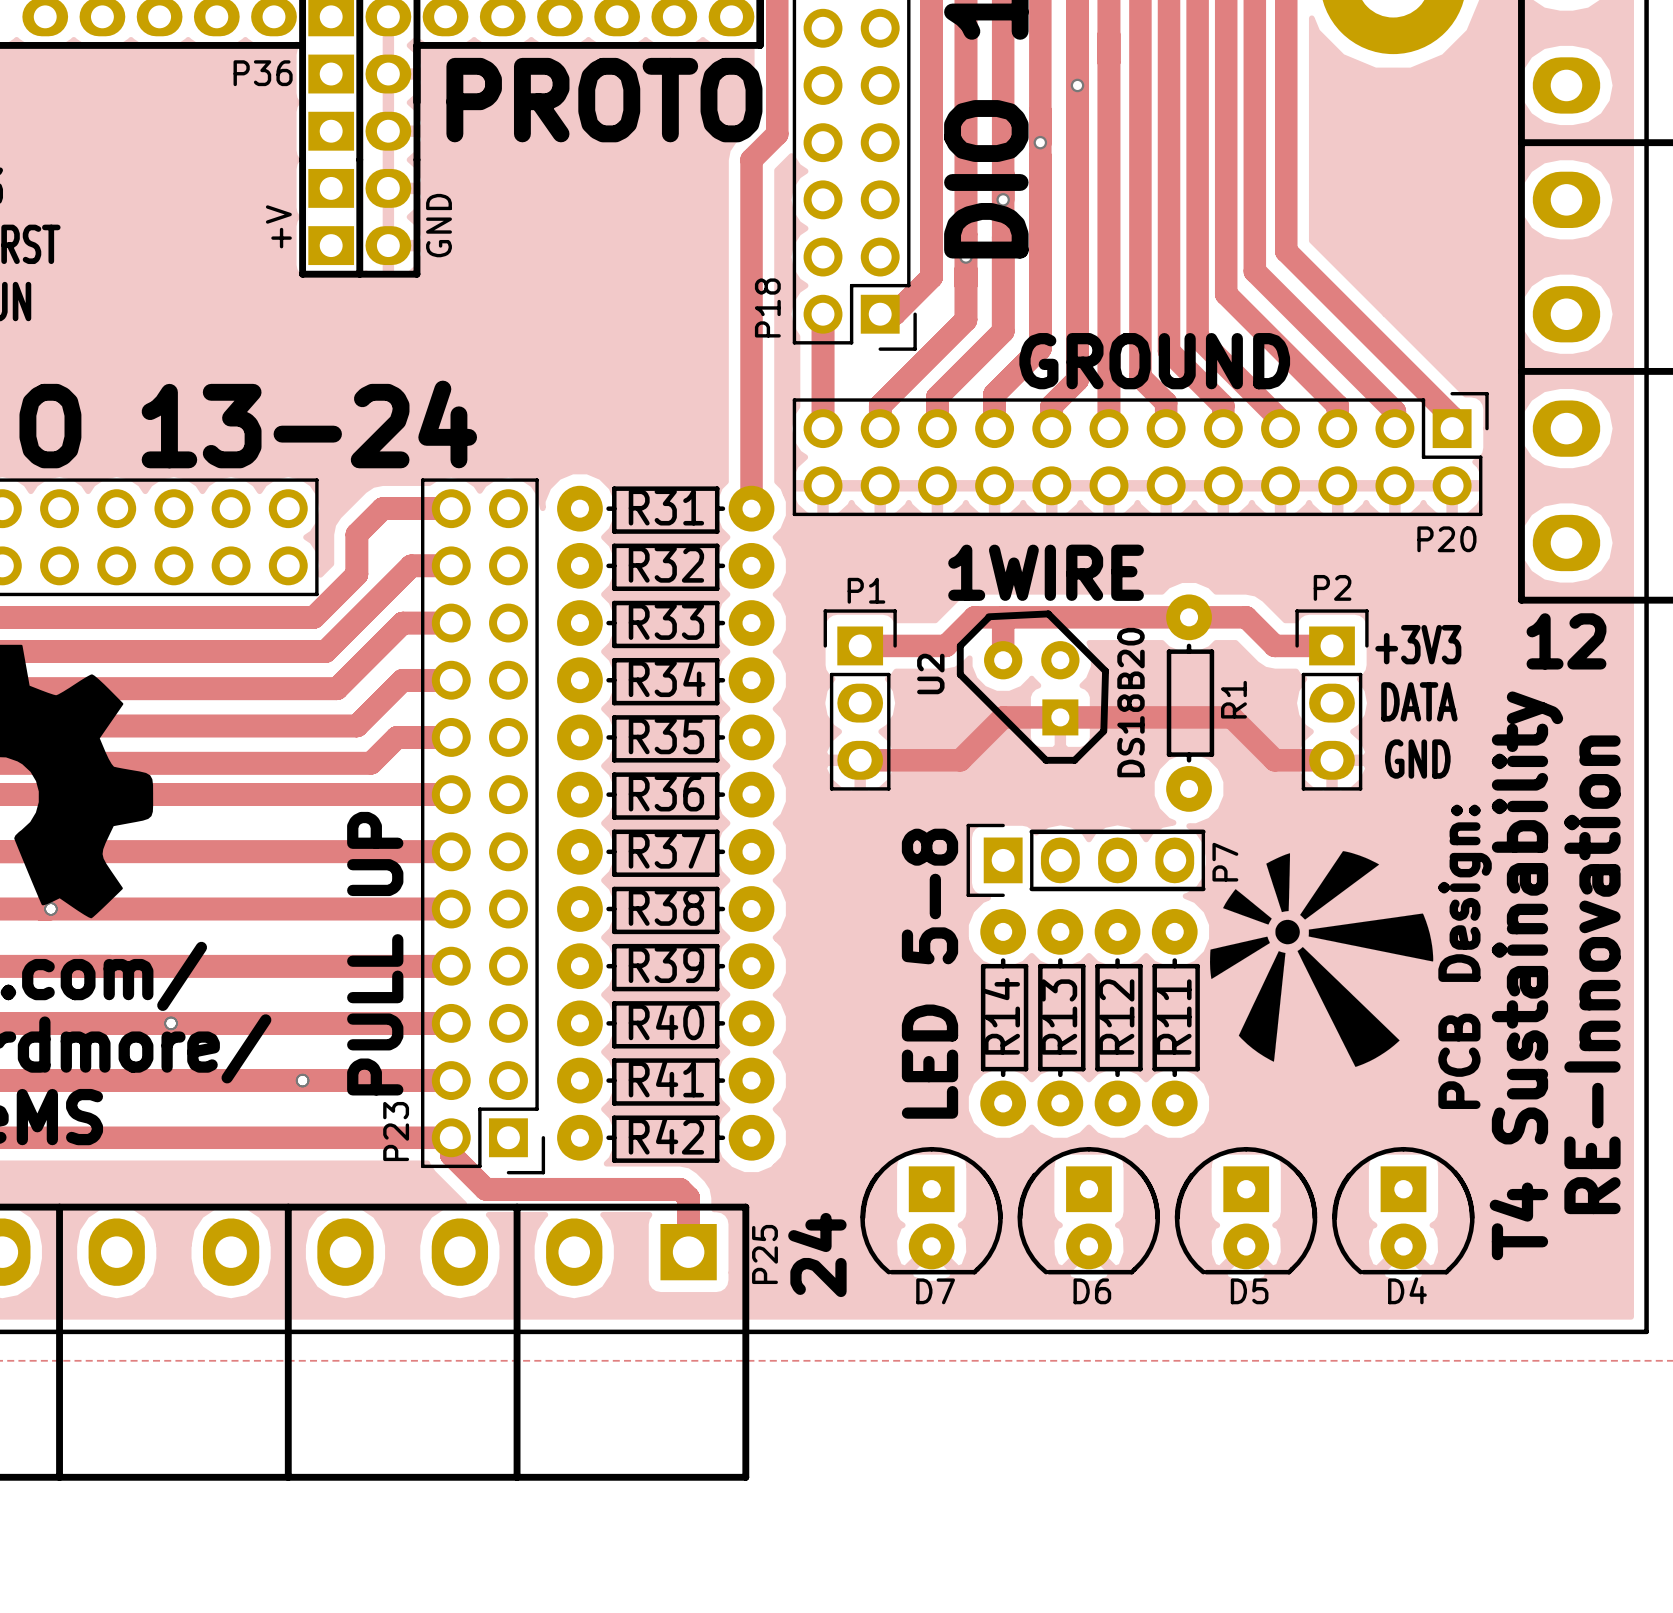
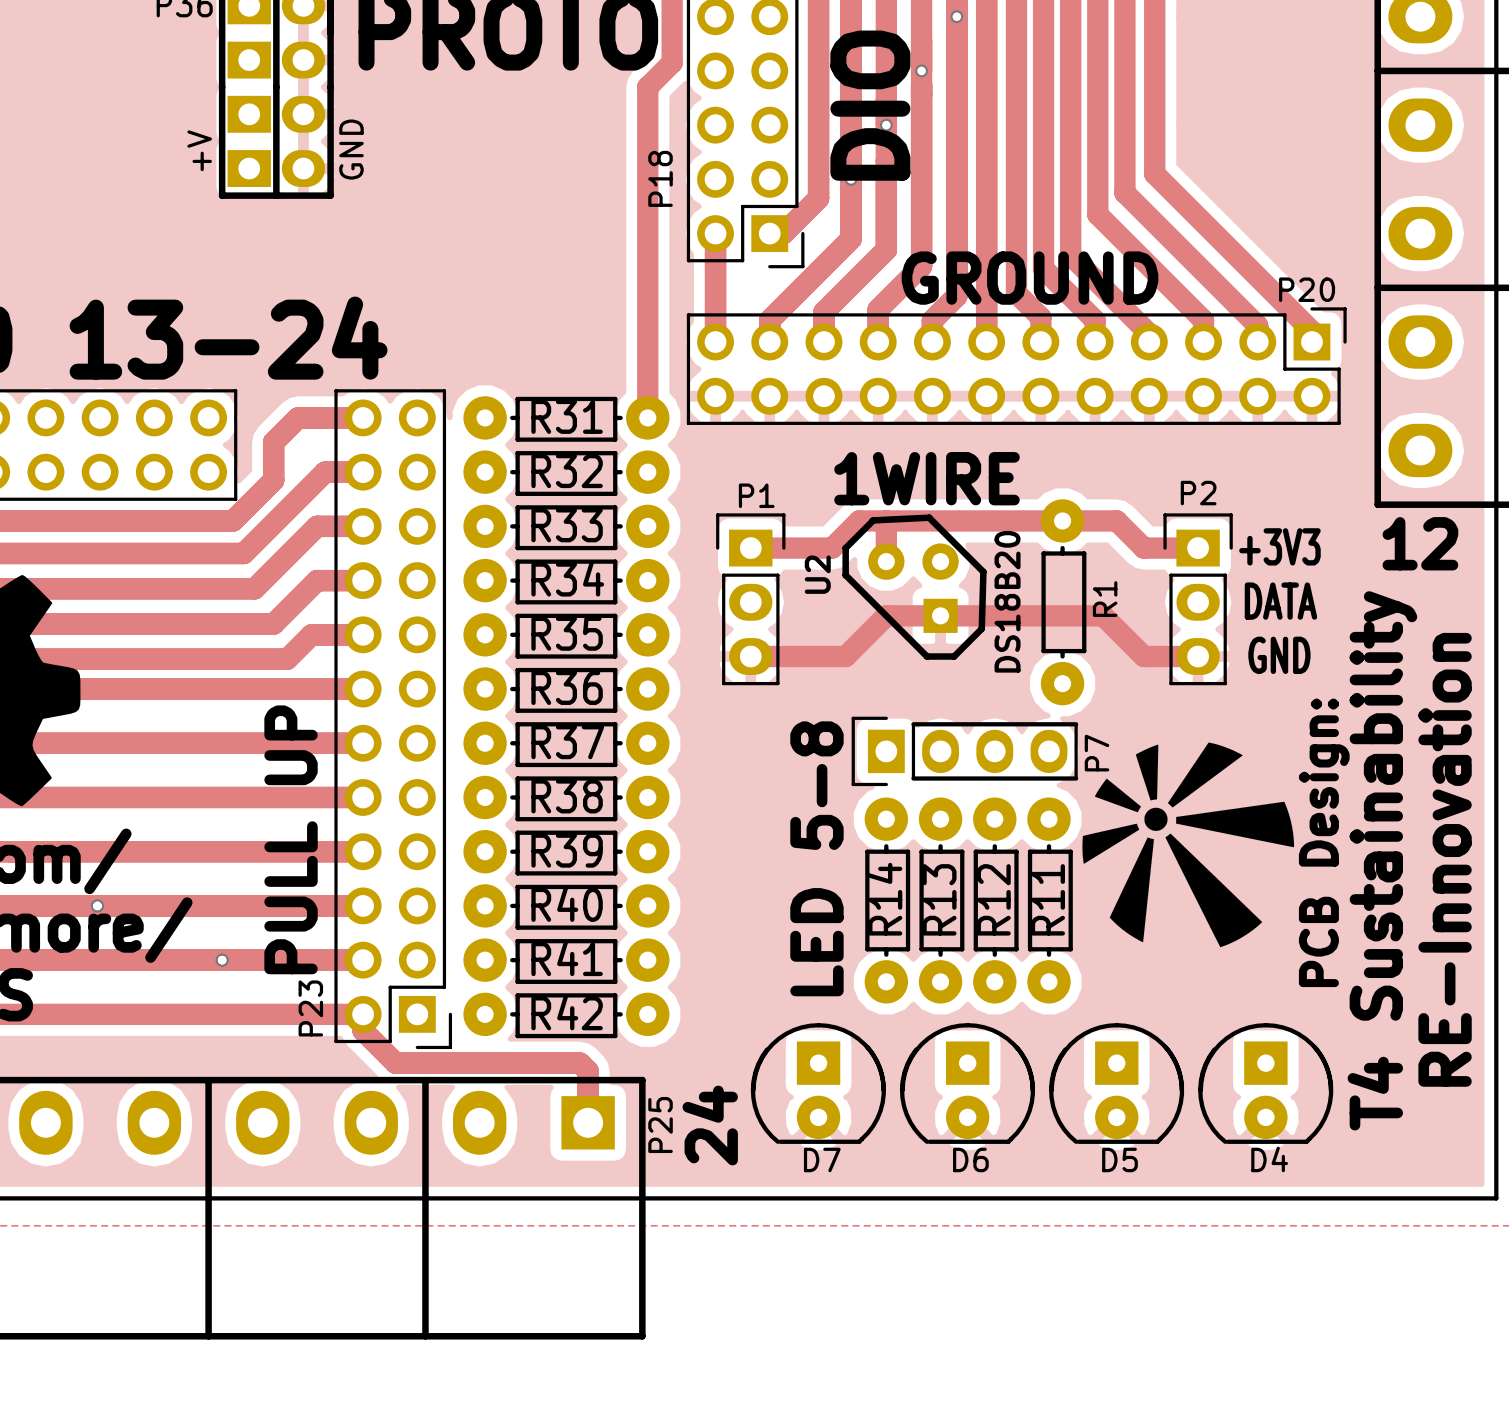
P18 name position: P18 (767, 307) -> P18 (660, 178)
P20 name position: P20 (1446, 539) -> P20 (1307, 289)

